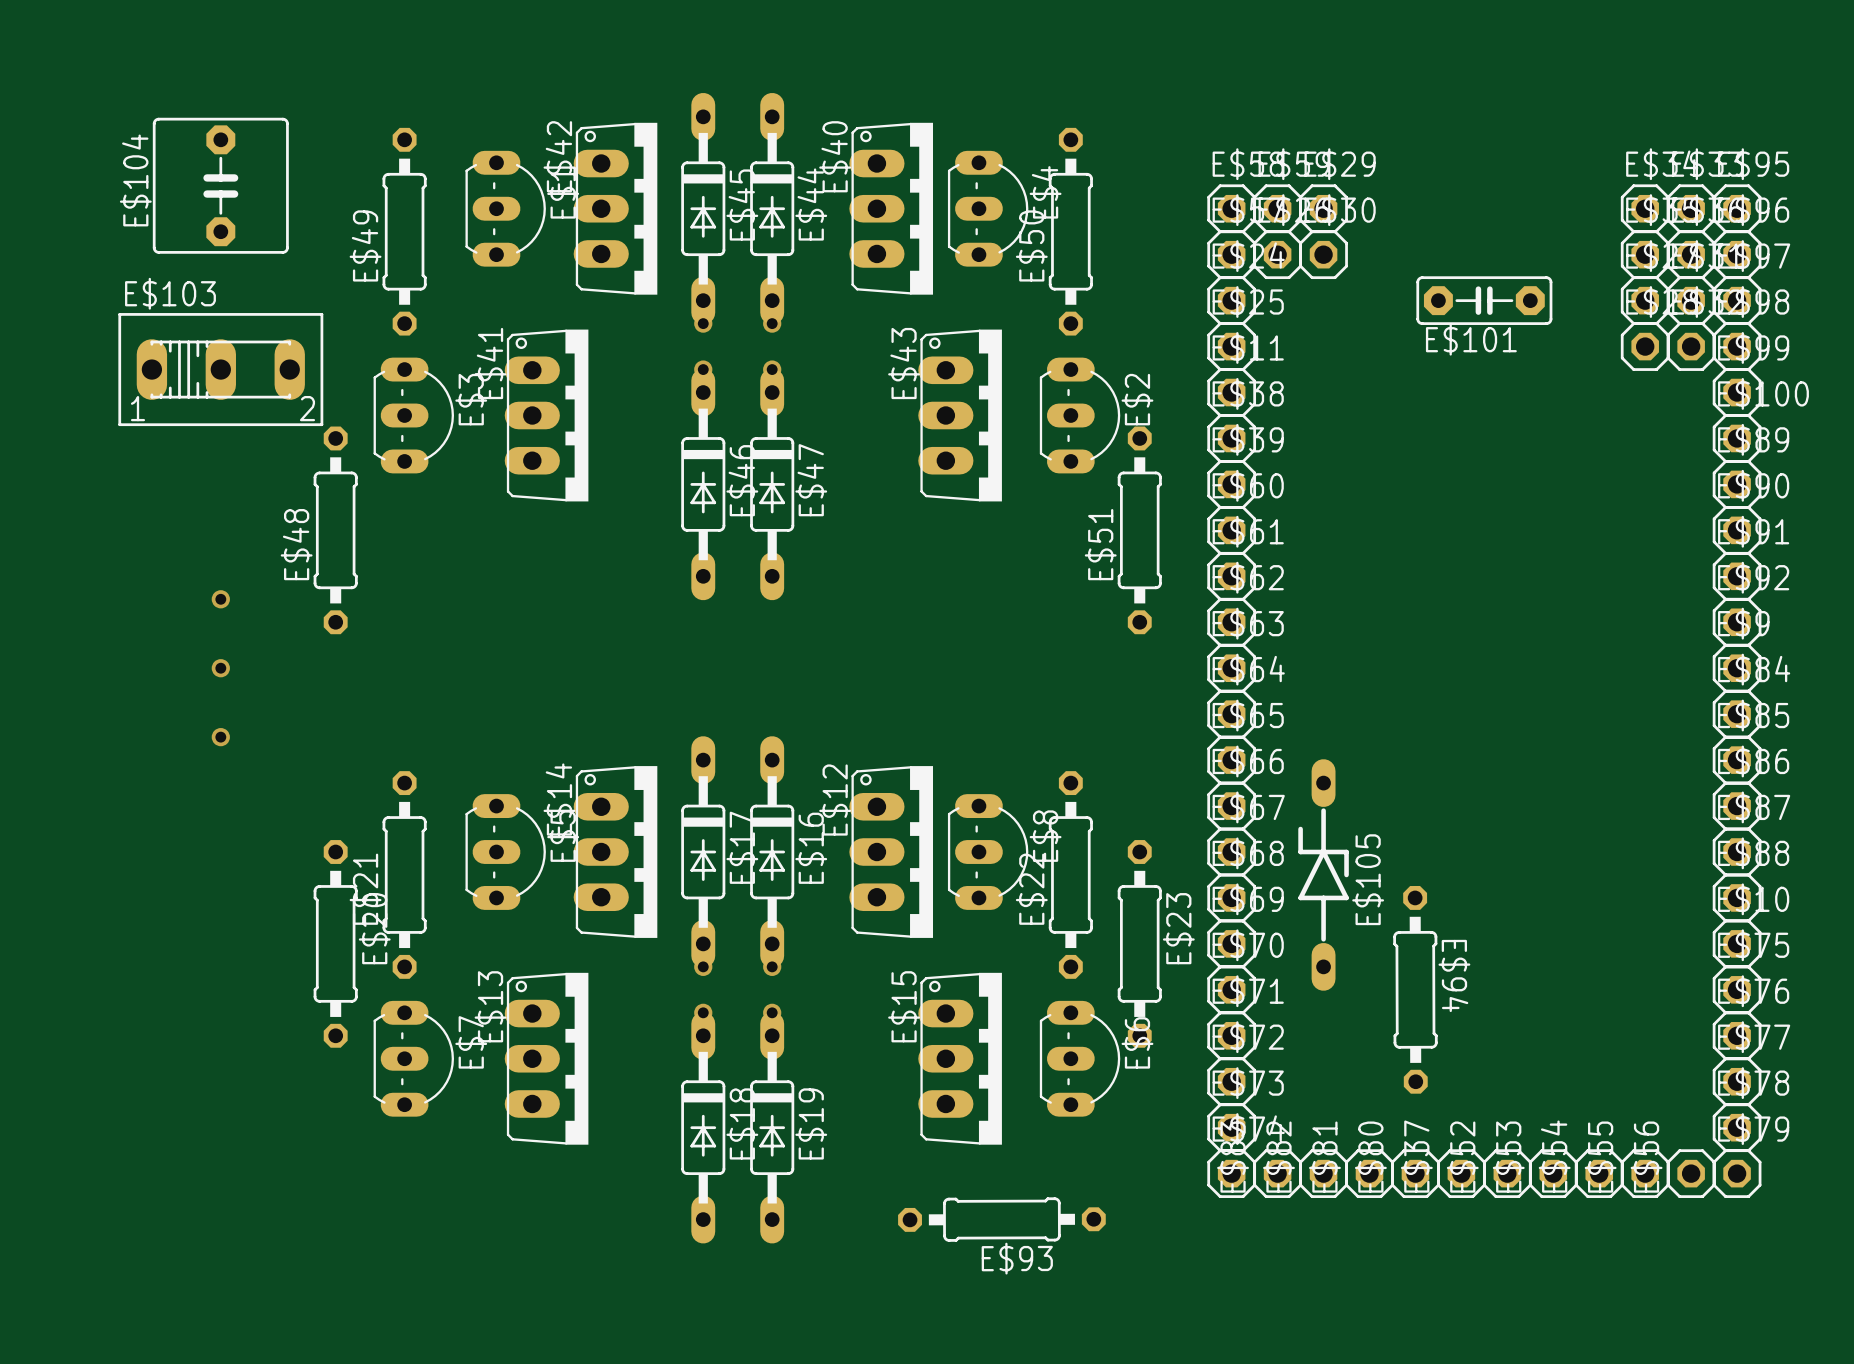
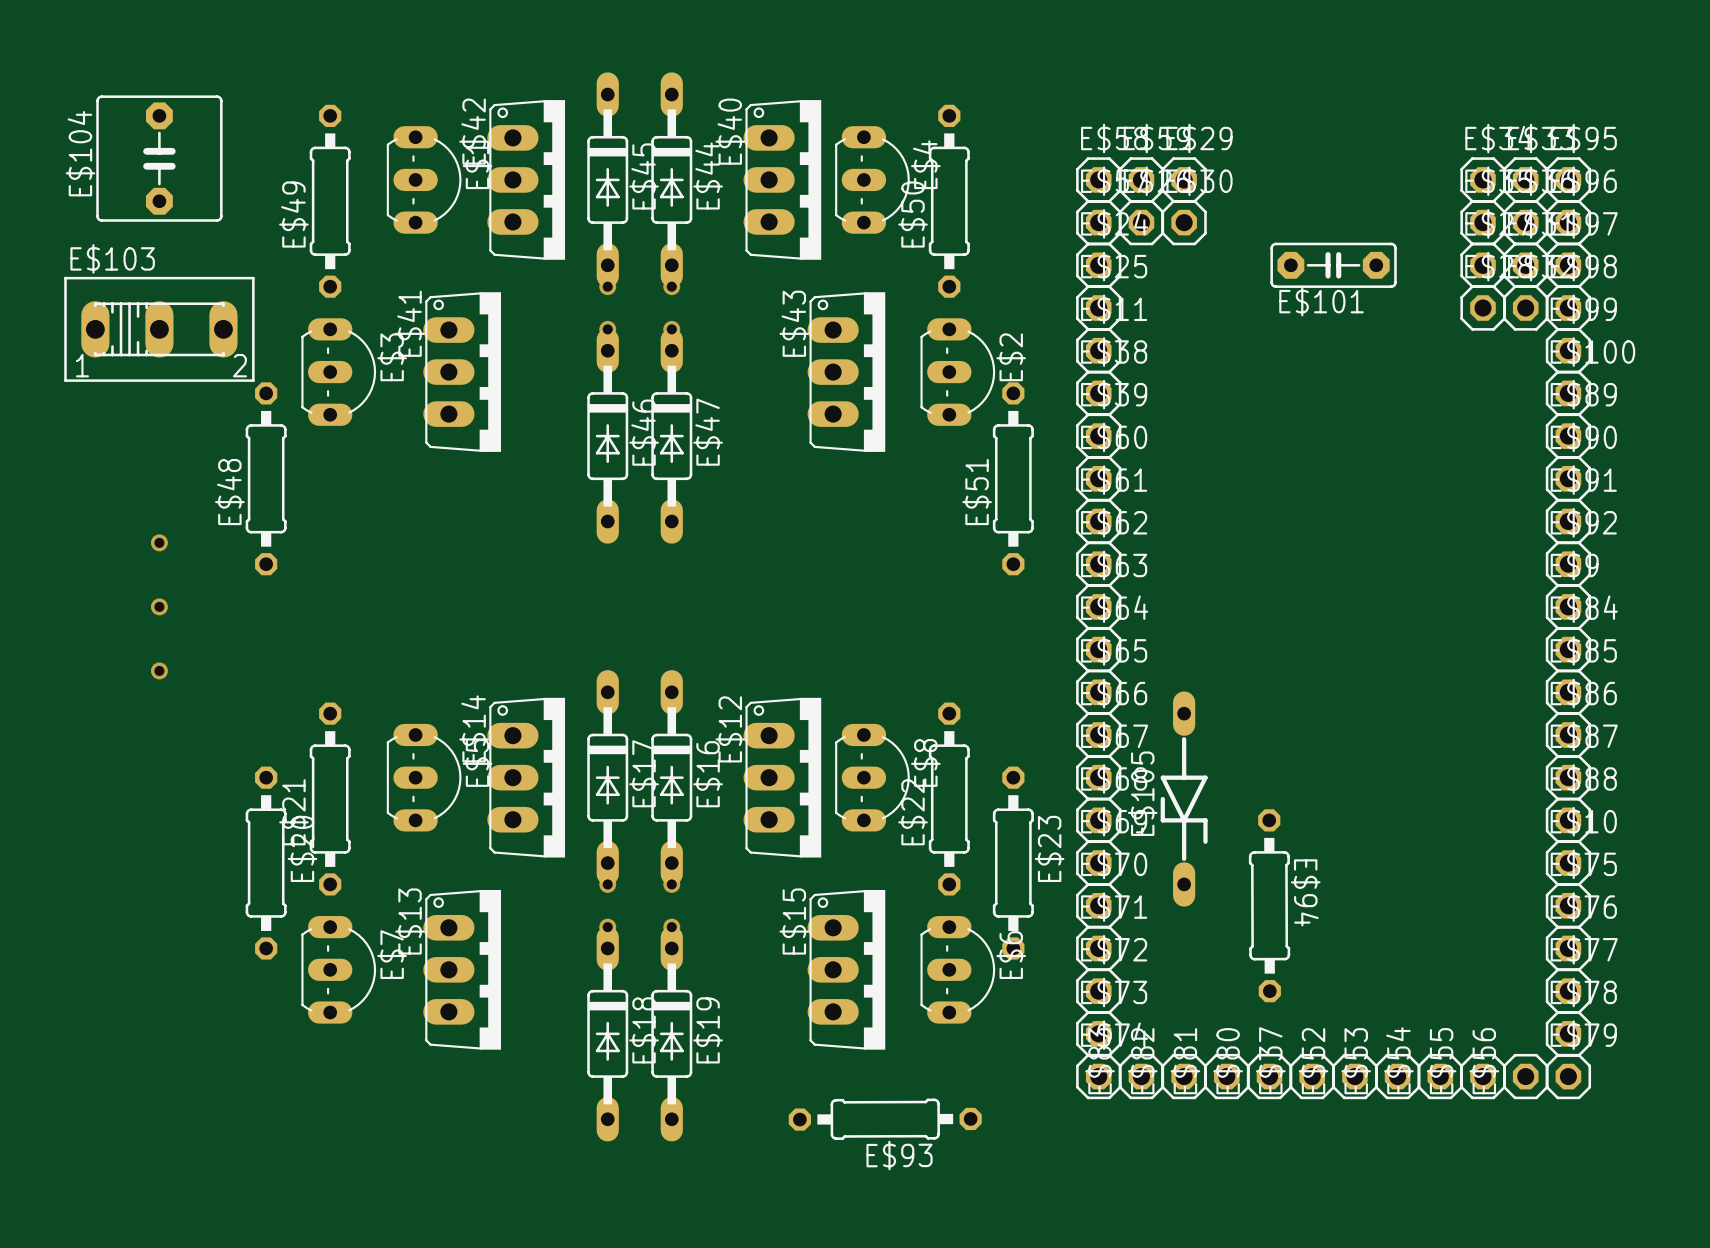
E$105 rotation: 0° (1323, 874) -> 180° (1184, 799)

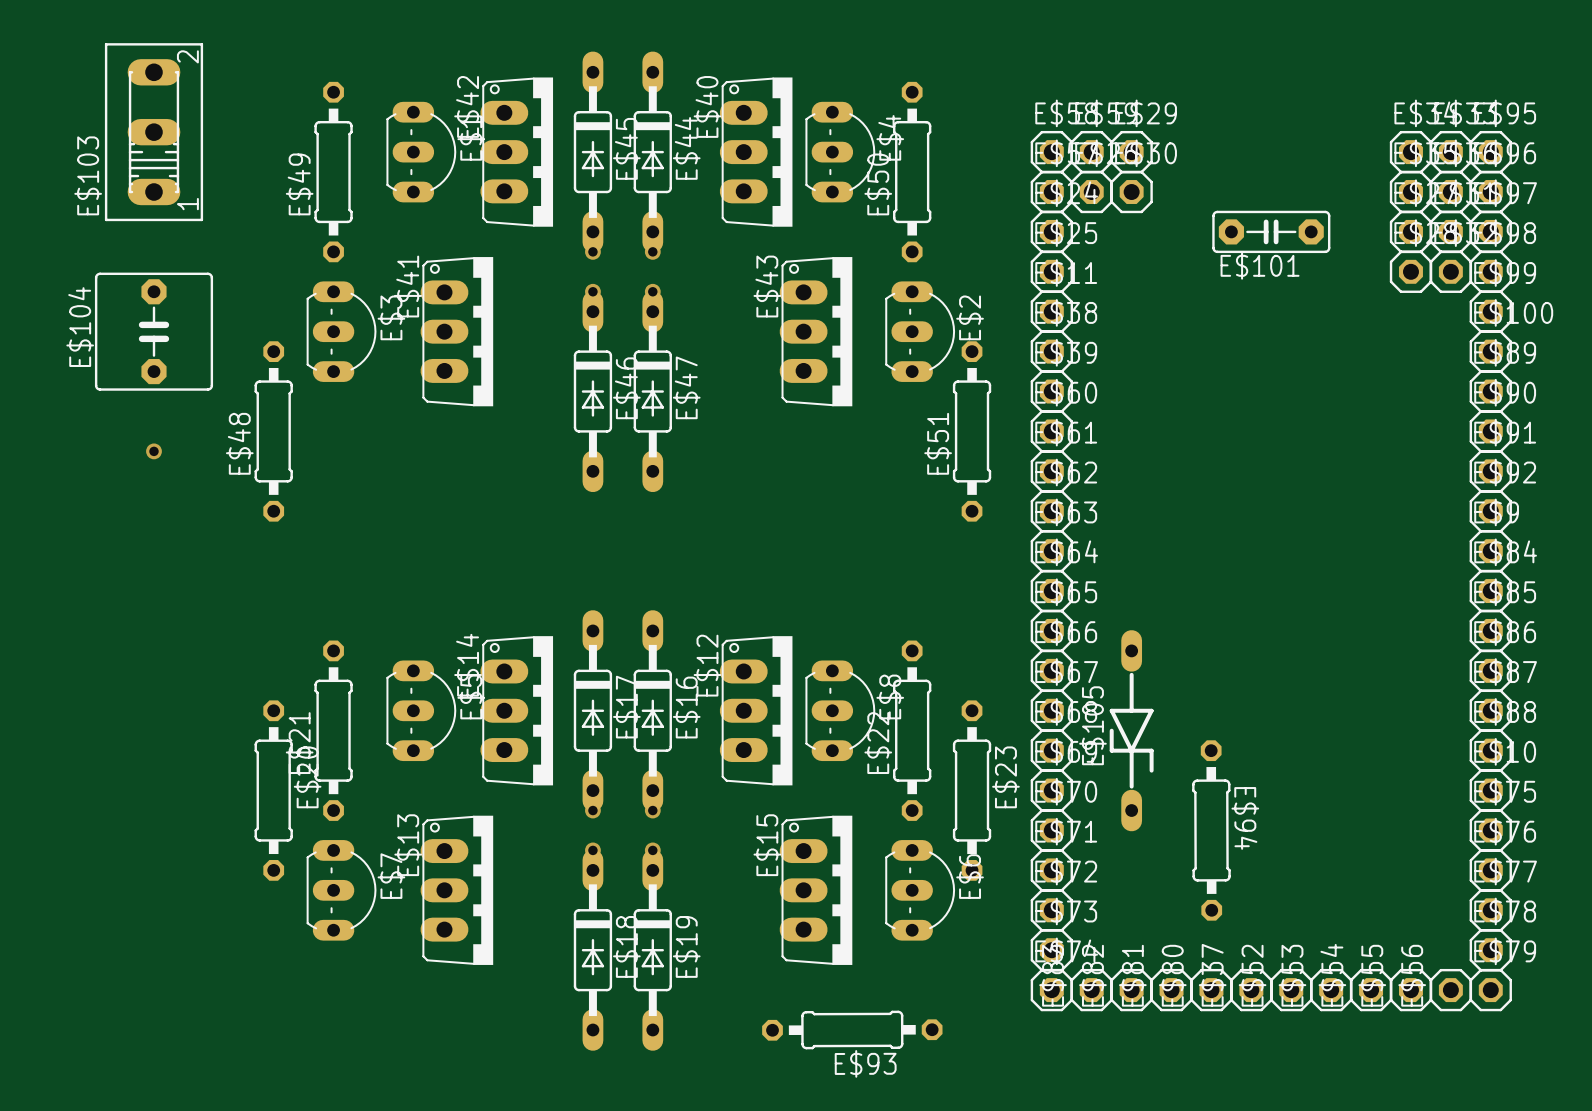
E$104 position: (159, 158) -> (153, 331)
E$103 rotation: 0° (159, 329) -> 90° counterclockwise (153, 132)
E$103 position: (159, 329) -> (153, 132)
via position: (159, 542) -> (153, 451)
via: (159, 606) -> none
via: (159, 670) -> none

